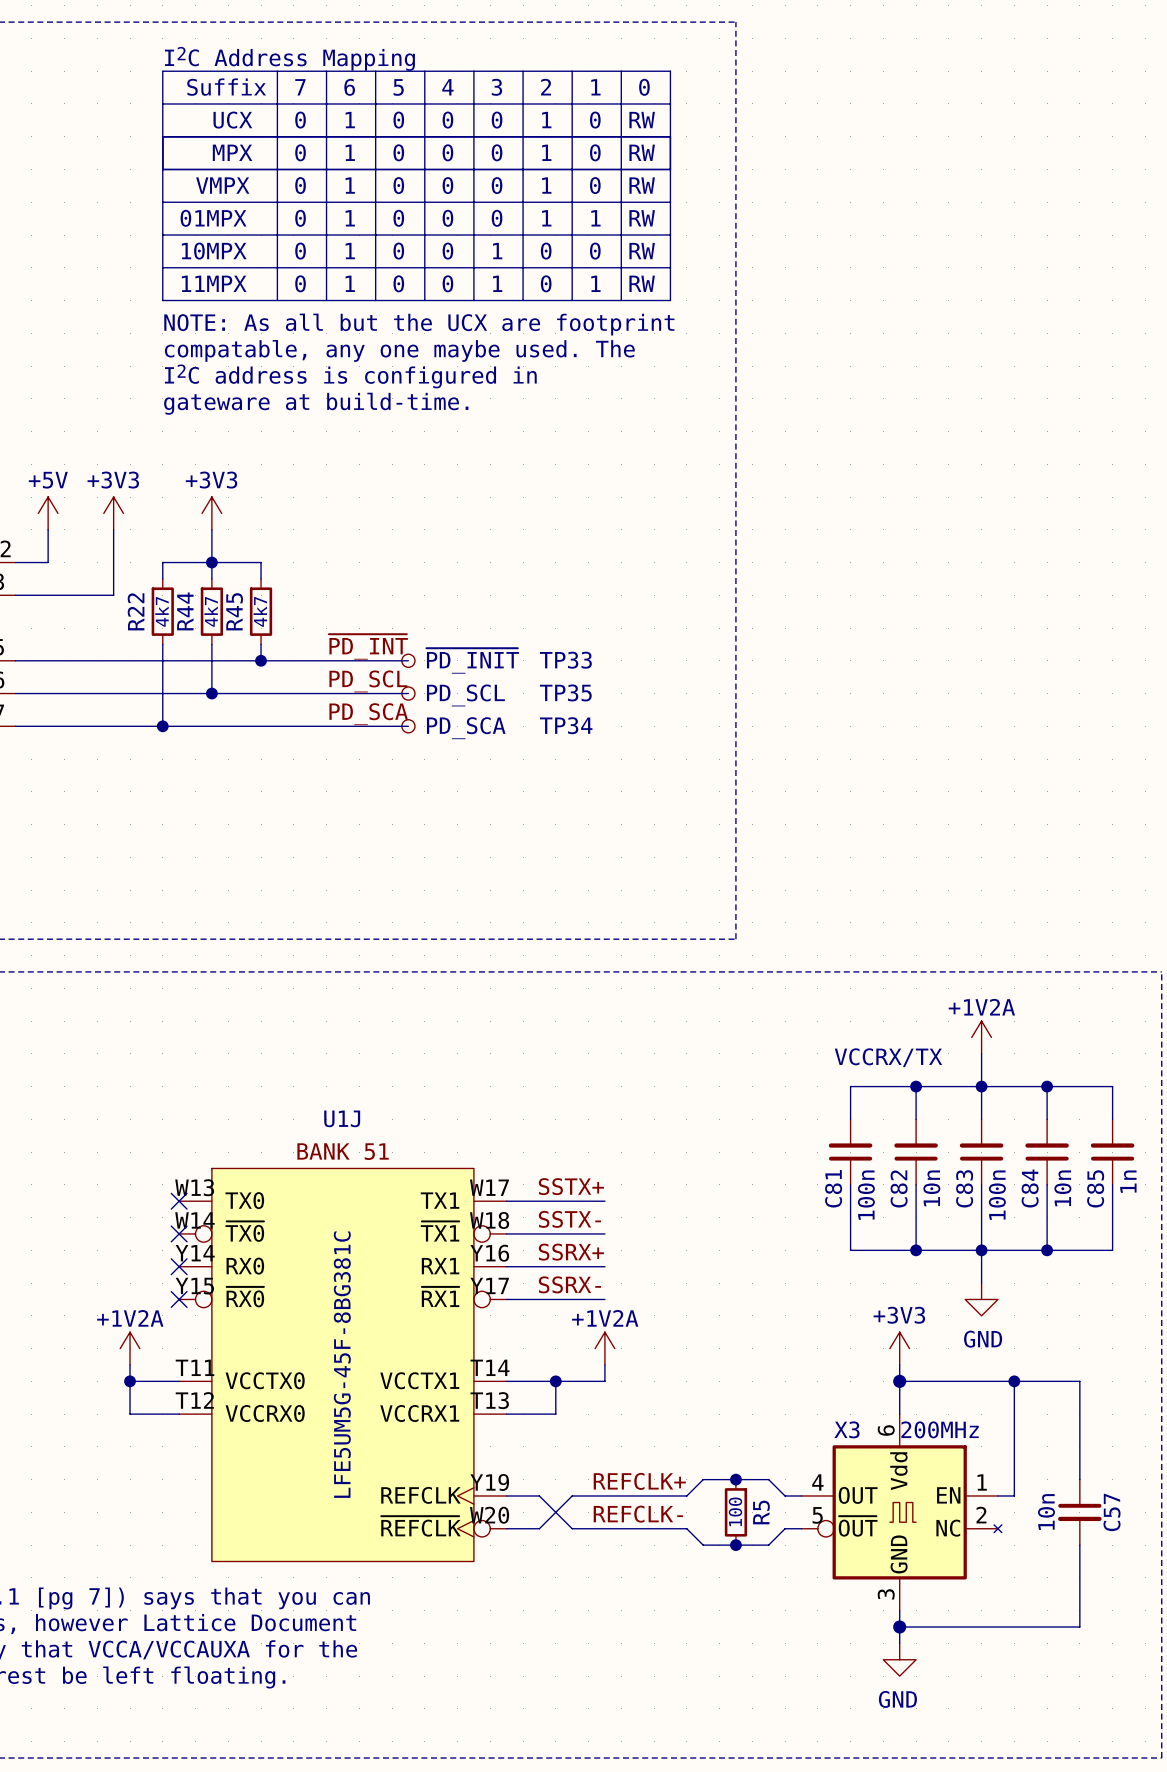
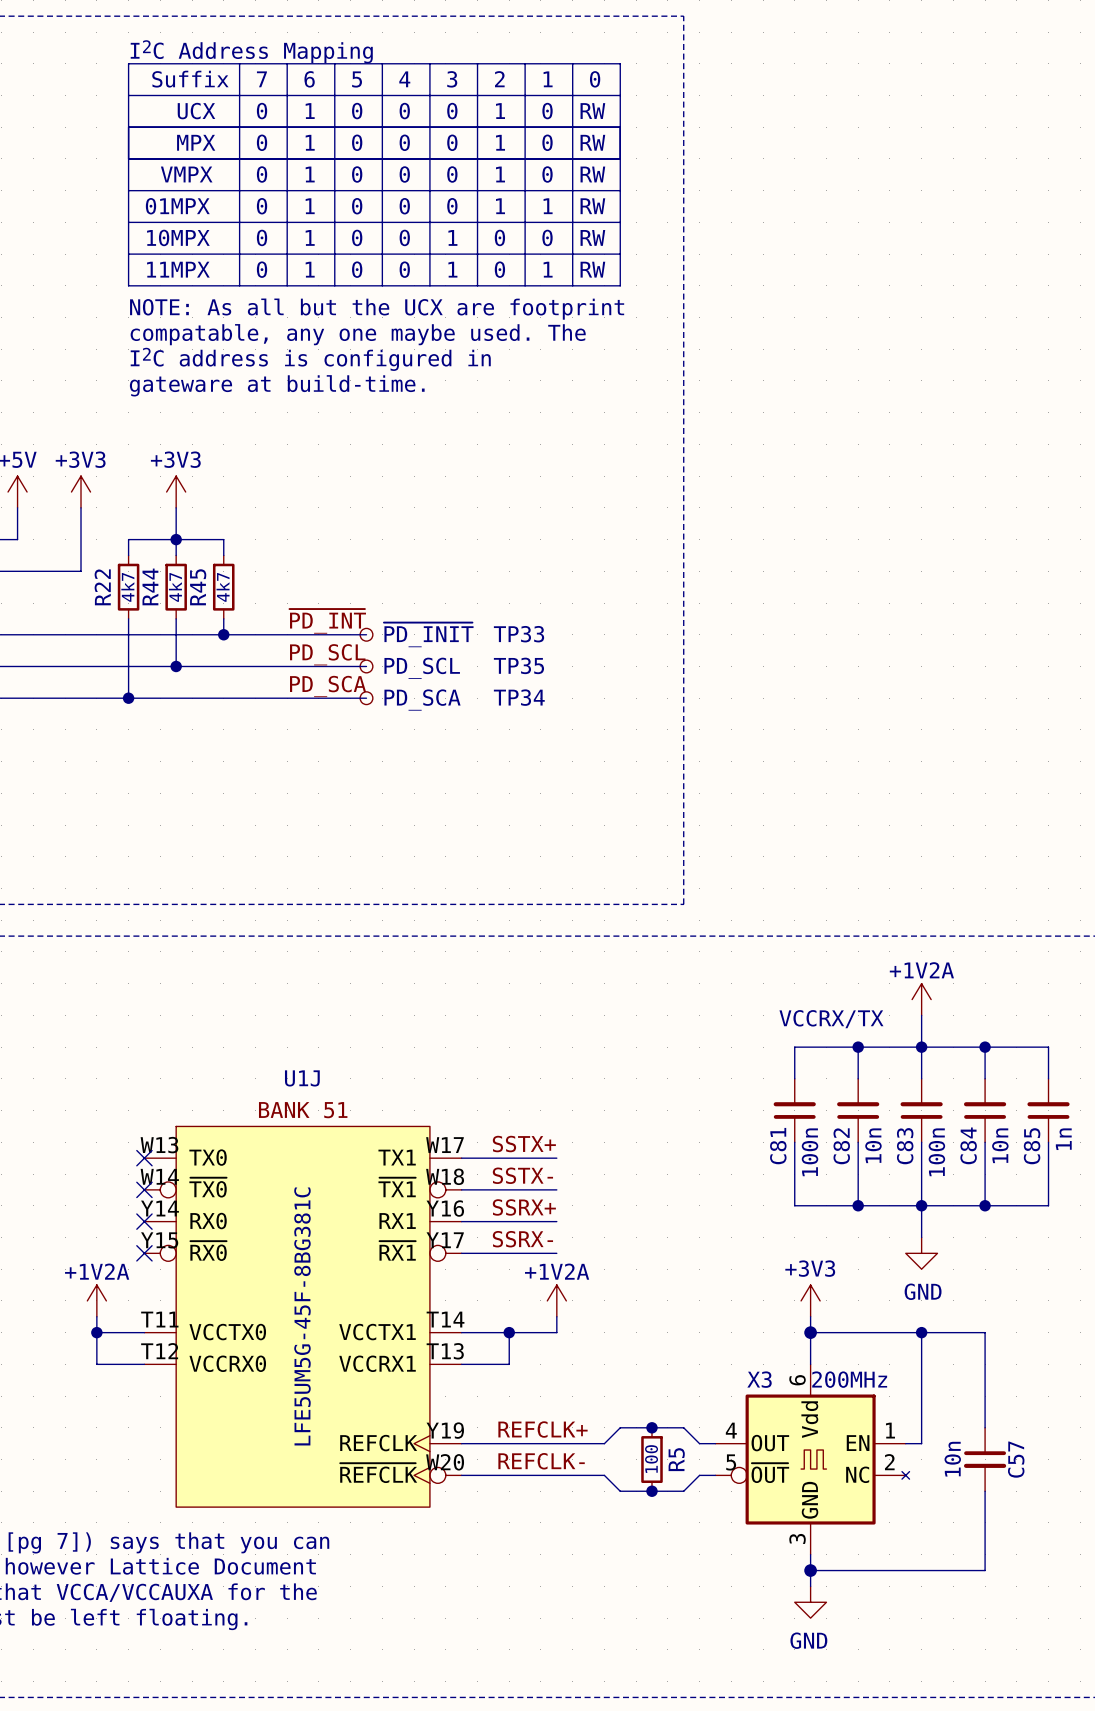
power symbol position: +3V3 (899, 1348) -> +3V3 (810, 1300)
wire: (899, 1364) (899, 1414) -> (810, 1316) (810, 1364)
wire: none -> (810, 1332) (842, 1332)
junction position: (899, 1381) -> (810, 1332)
wire: (1014, 1381) (1014, 1495) (997, 1495) -> (921, 1332) (921, 1443) (905, 1443)
junction position: (1014, 1381) -> (921, 1332)
wire: (1047, 1381) (1079, 1381) (1079, 1479) -> (985, 1332) (985, 1427)
wire: (703, 1479) (686, 1495) (654, 1495) -> (651, 1427) (620, 1427) (604, 1443)
wire: (735, 1479) (768, 1479) (785, 1495) (801, 1495) -> (683, 1427) (699, 1443) (715, 1443)
junction position: (735, 1479) -> (651, 1427)
label position: REFCLK+ (639, 1481) -> REFCLK+ (543, 1429)
wire: (539, 1495) (572, 1528) -> (493, 1443) (525, 1443)
wire: (572, 1495) (539, 1528) -> (525, 1475) (493, 1475)
R5 position: (735, 1512) -> (651, 1459)
X3 position: (901, 1512) -> (812, 1459)
C57 position: (1079, 1512) -> (985, 1459)
label position: REFCLK- (638, 1514) -> REFCLK- (541, 1461)
wire: (654, 1528) (686, 1528) (703, 1545) -> (604, 1475) (620, 1491) (651, 1491)
wire: (801, 1528) (785, 1528) (768, 1545) (735, 1545) -> (715, 1475) (699, 1475) (683, 1491)
junction position: (735, 1545) -> (651, 1491)
wire: (1079, 1545) (1079, 1627) (1047, 1627) -> (985, 1491) (985, 1570)
wire: (899, 1610) (899, 1643) -> (810, 1554) (810, 1586)
wire: none -> (810, 1570) (842, 1570)
junction position: (899, 1627) -> (810, 1570)
power symbol position: GND (899, 1659) -> GND (810, 1602)

